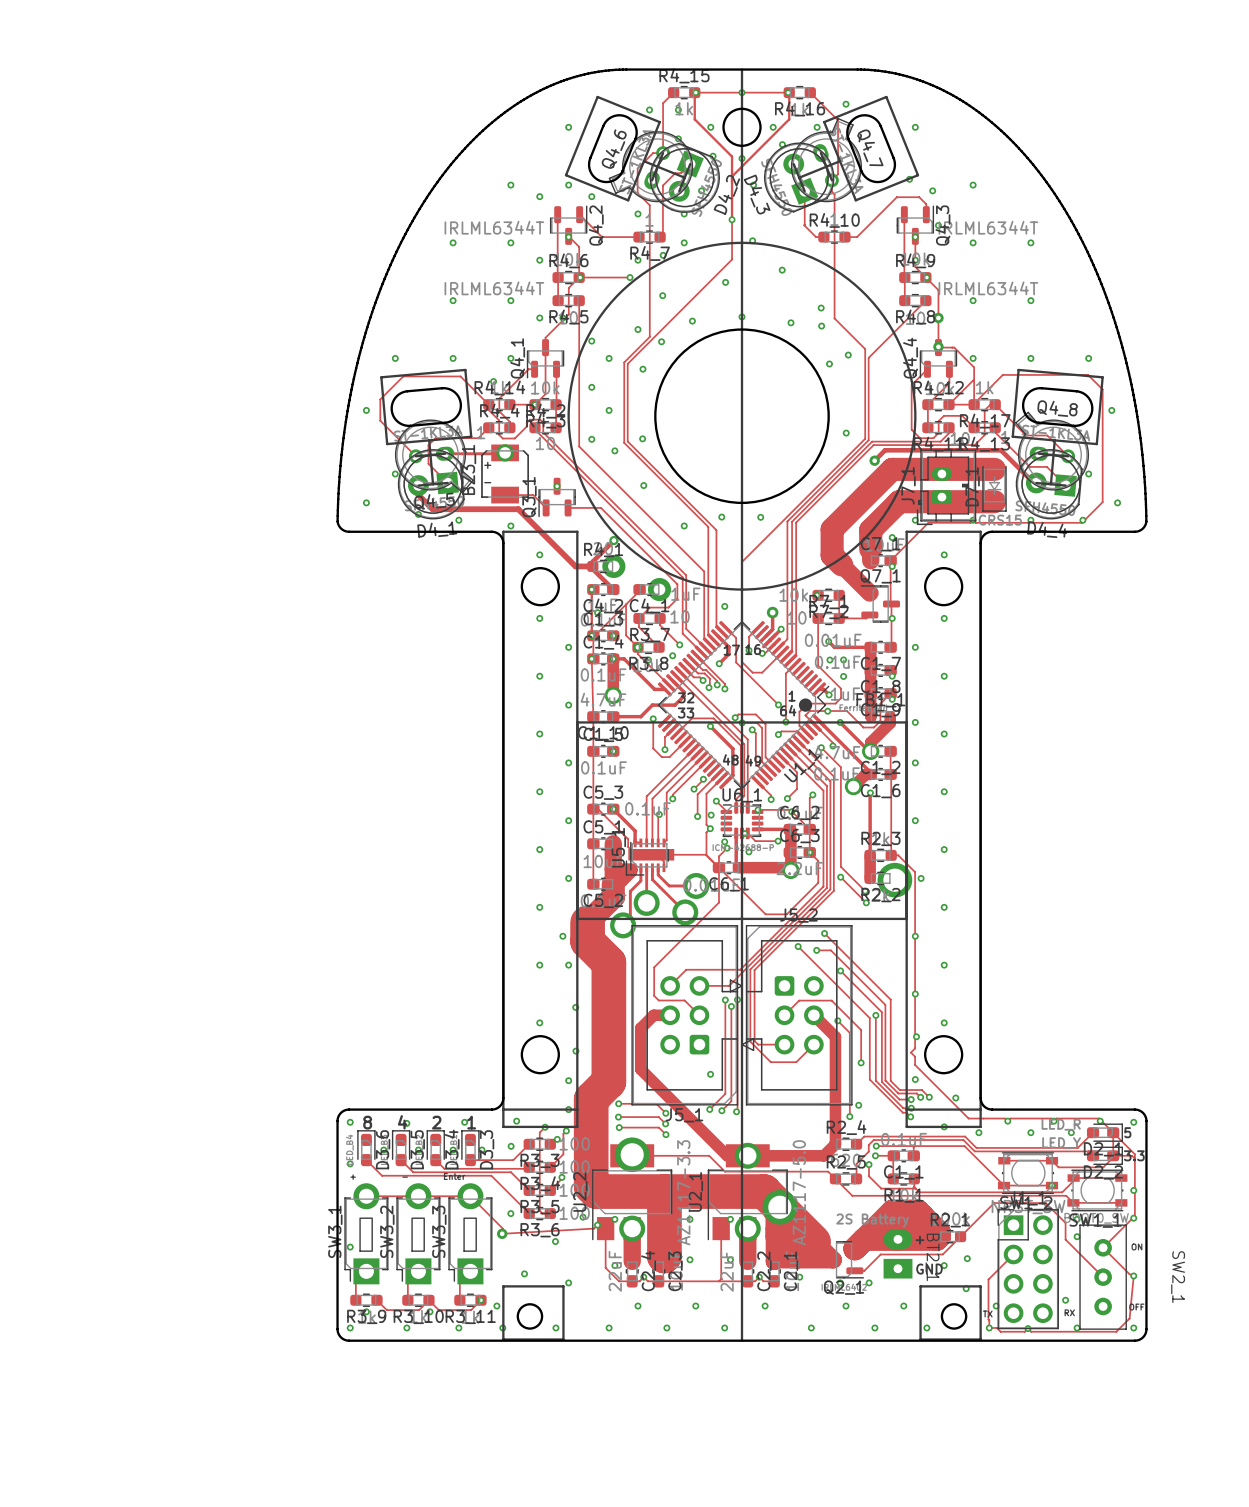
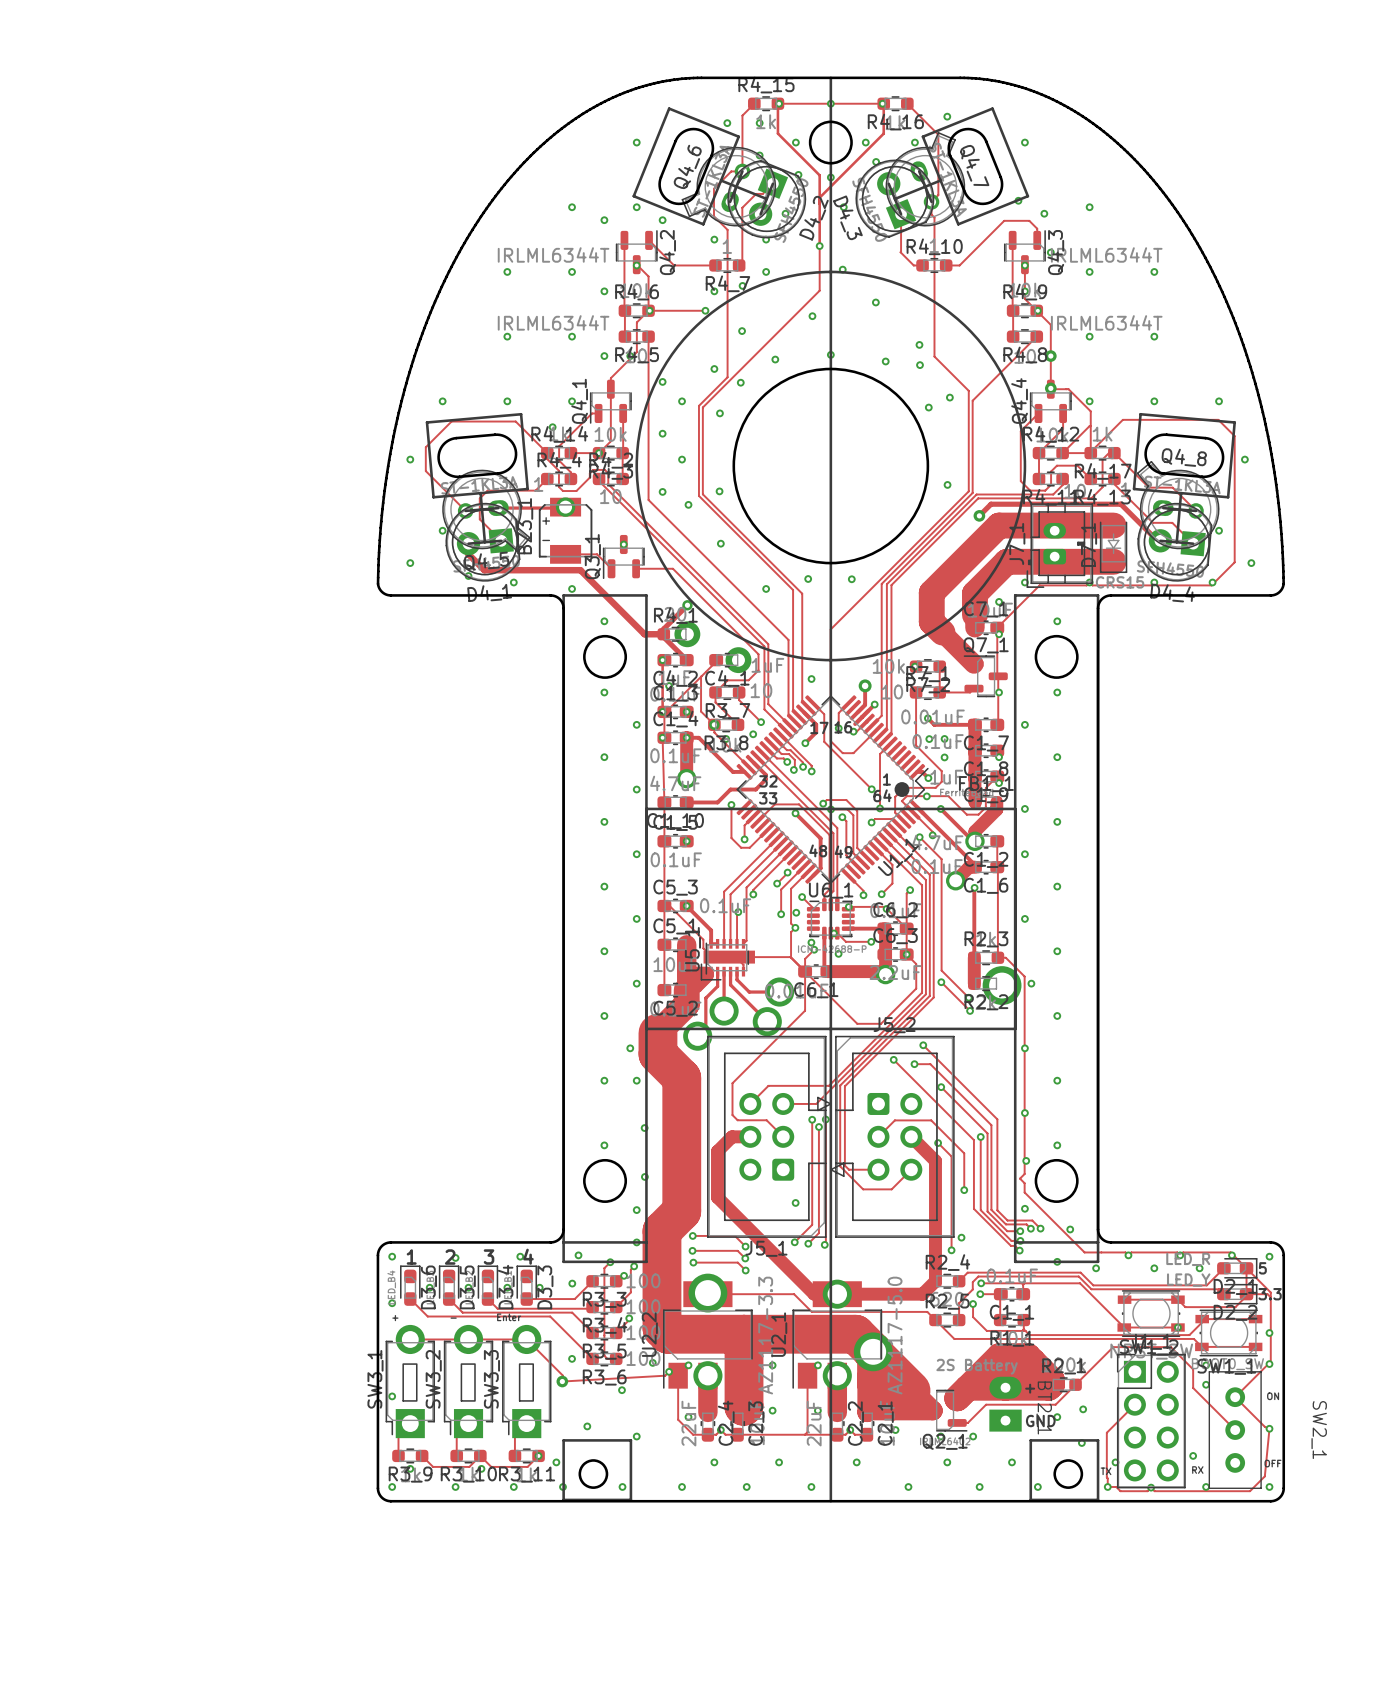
text: 8 (367, 1122) -> 1 (411, 1257)
text: 4 (402, 1122) -> 2 (450, 1257)
text: 2 (436, 1122) -> 3 (489, 1257)
text: 1 (471, 1122) -> 4 (528, 1256)

